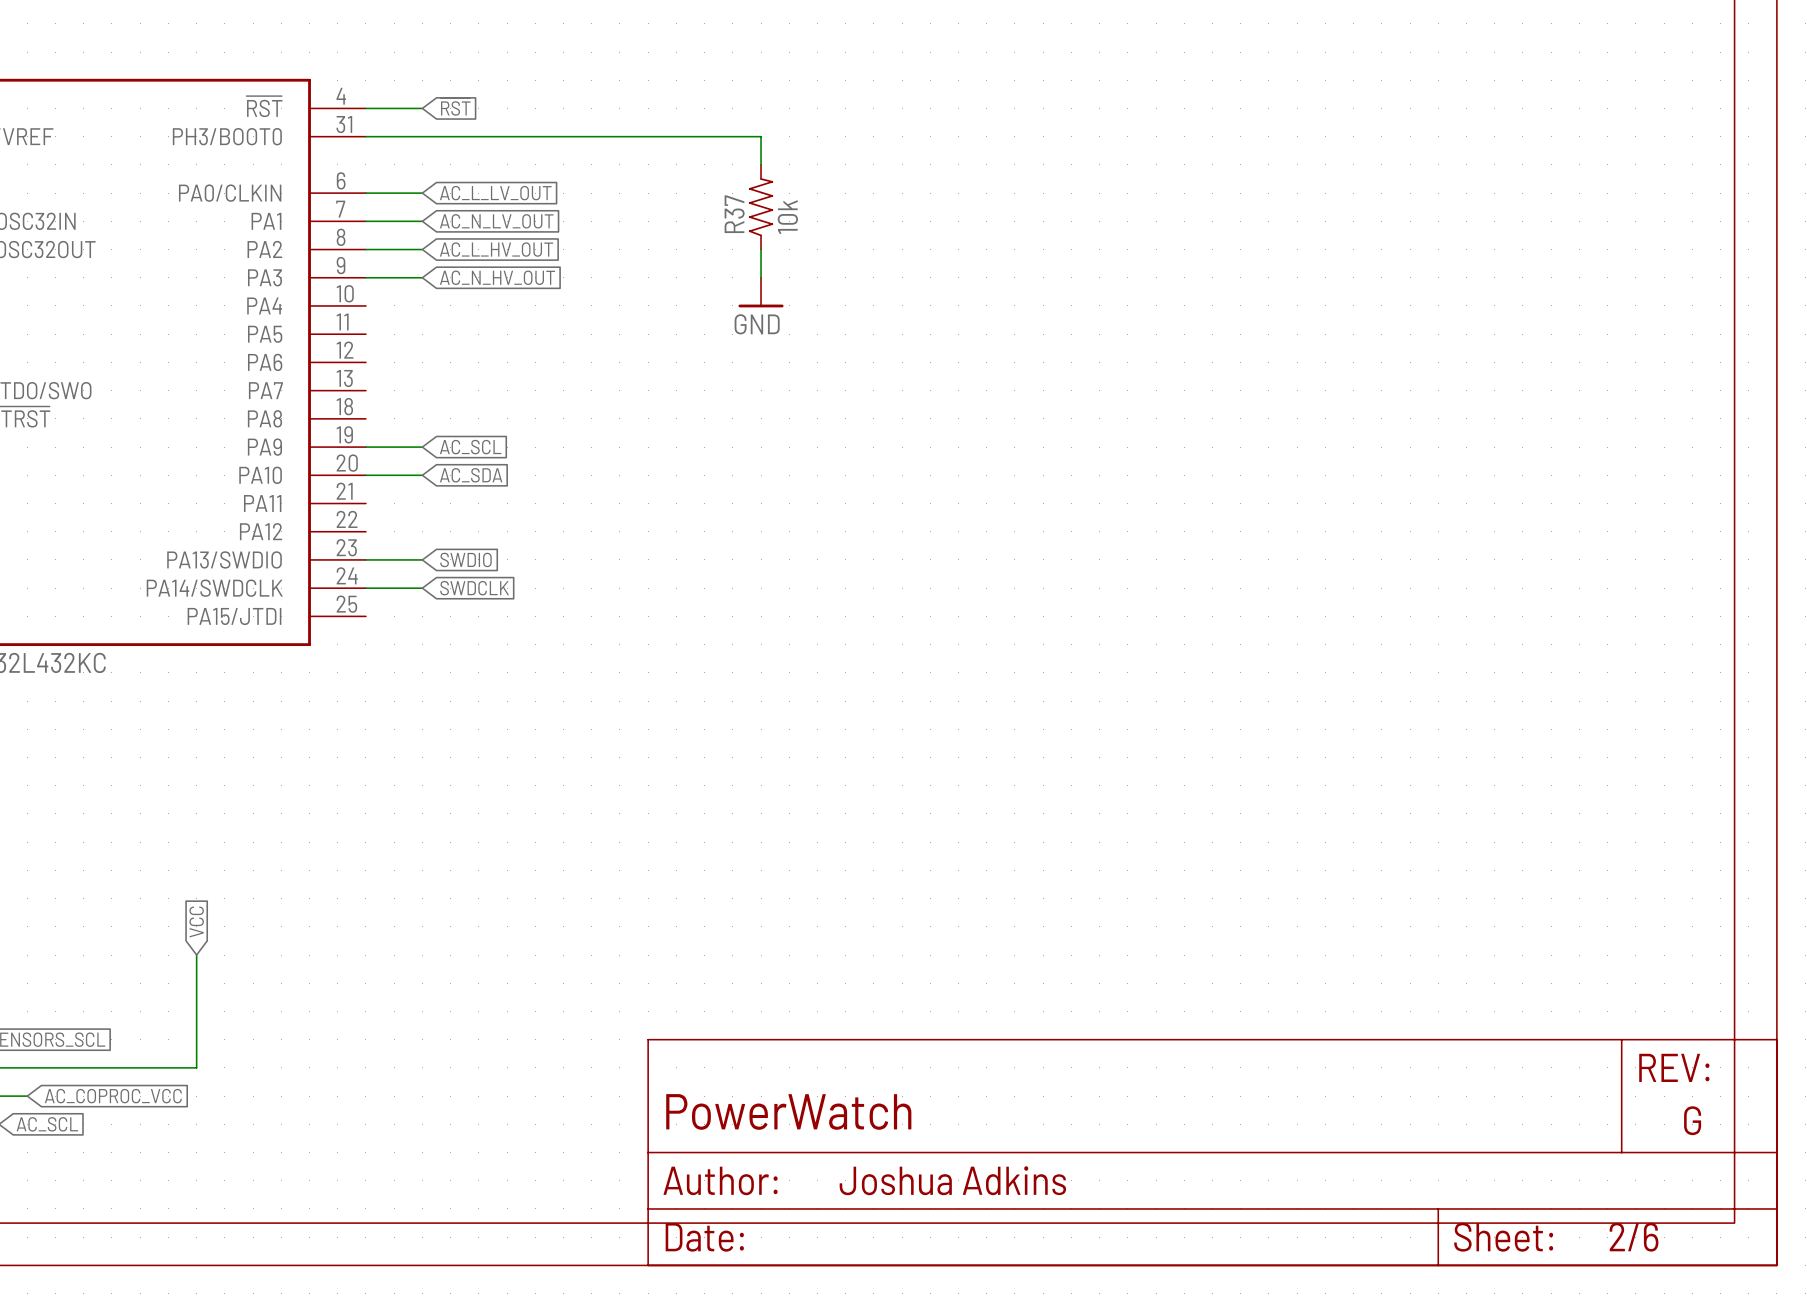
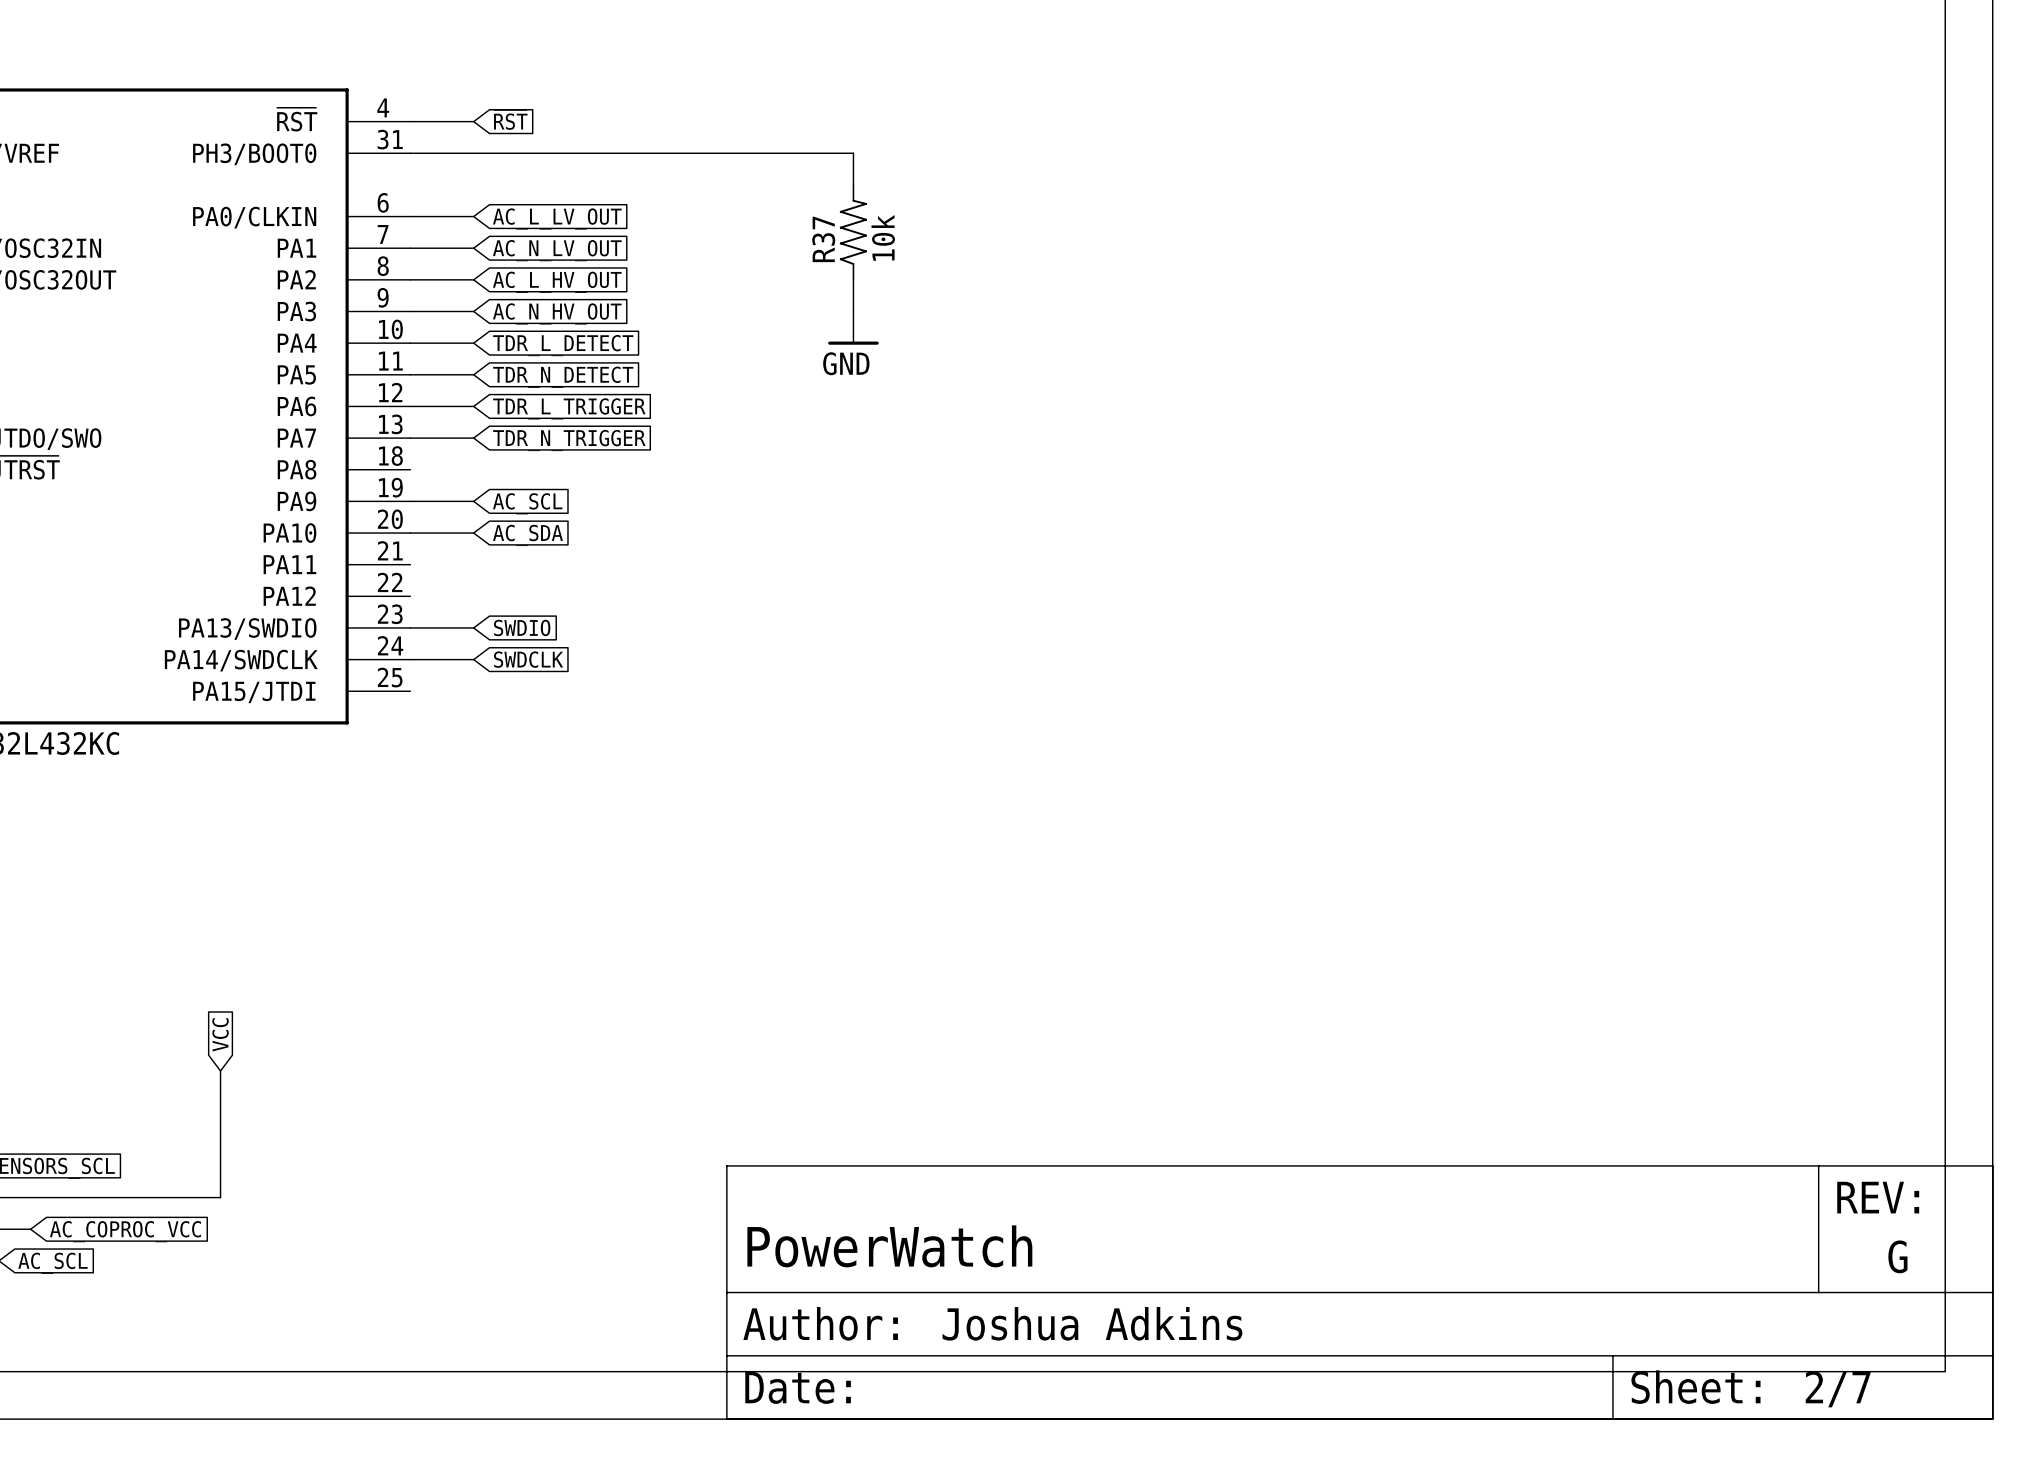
wire: none -> (410, 343) (473, 343)
global label: none -> TDR_L_DETECT (563, 345)
wire: none -> (410, 374) (473, 374)
global label: none -> TDR_N_DETECT (563, 377)
wire: none -> (410, 406) (473, 406)
global label: none -> TDR_L_TRIGGER (569, 408)
wire: none -> (410, 438) (473, 438)
global label: none -> TDR_N_TRIGGER (569, 440)
part text: 2/6 (1634, 1237) -> 2/7 (1838, 1389)

